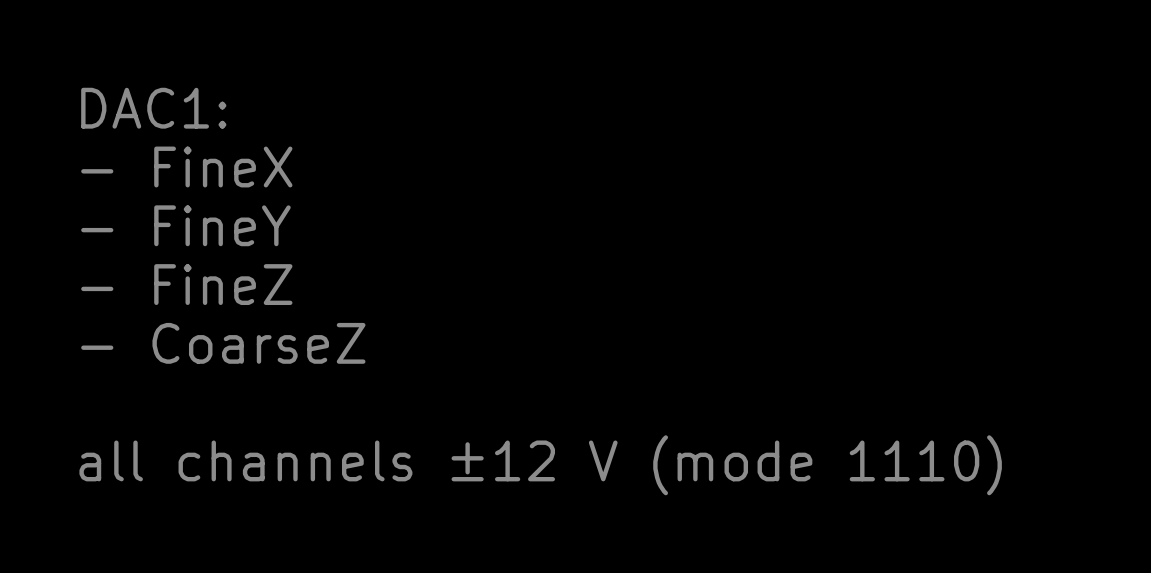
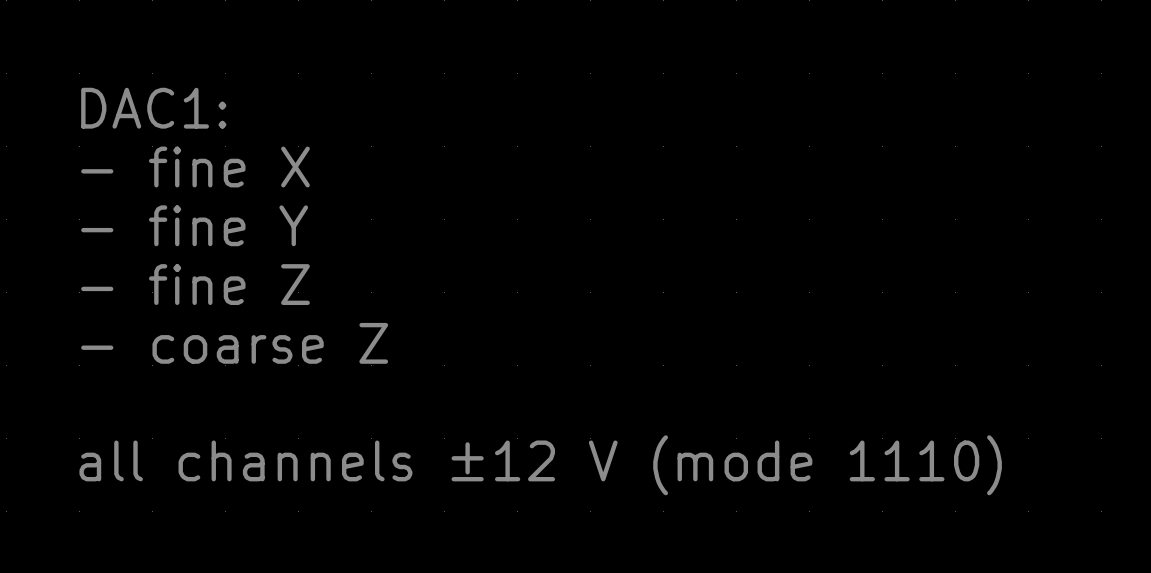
text: - FineX (186, 166) -> - fine X (195, 166)
text: - FineY (185, 225) -> - fine Y (194, 225)
text: - FineZ (186, 284) -> - fine Z (195, 284)
text: - CoarseZ (223, 343) -> - coarse Z (234, 343)

